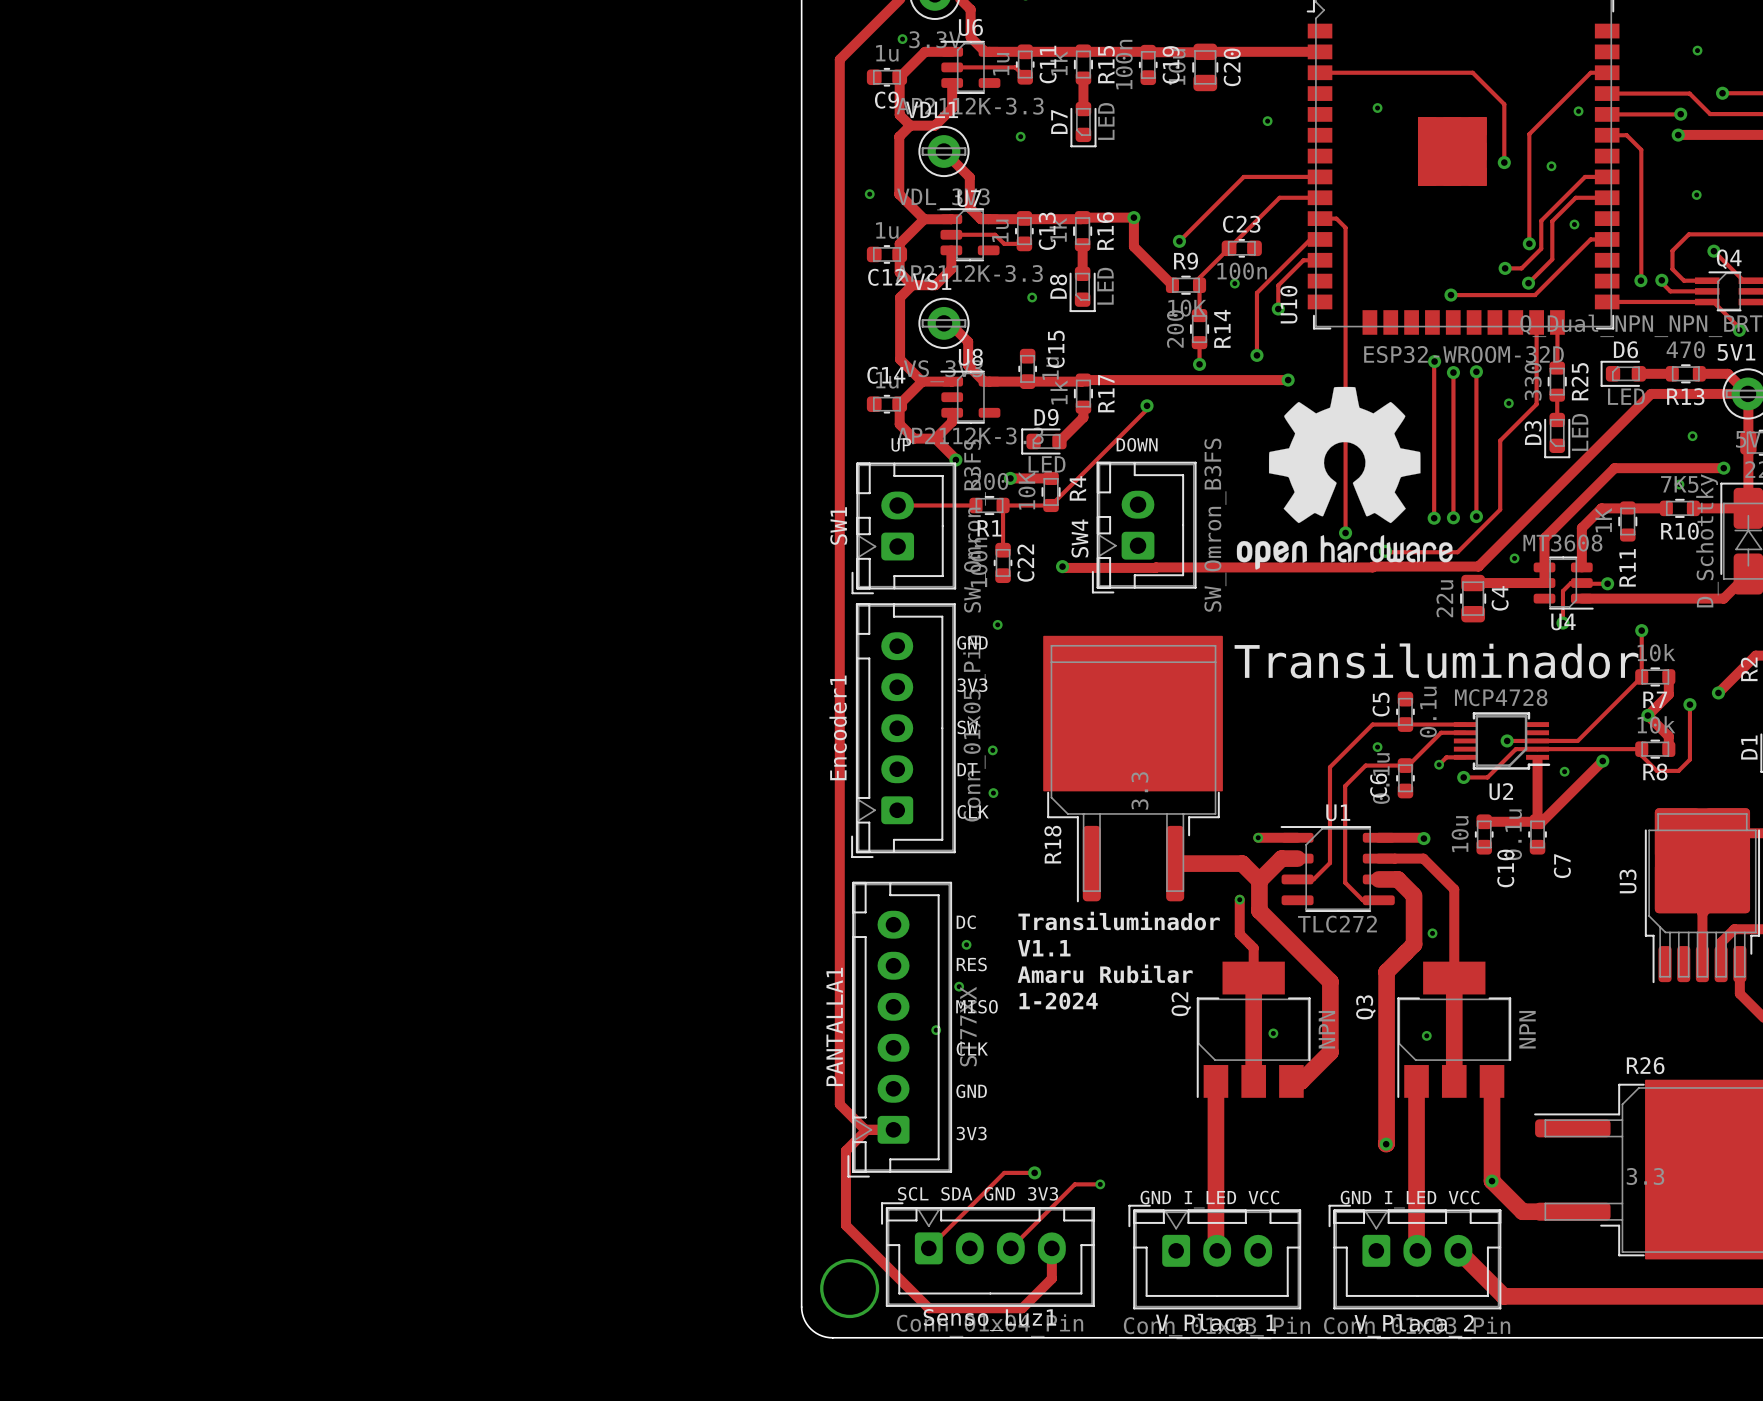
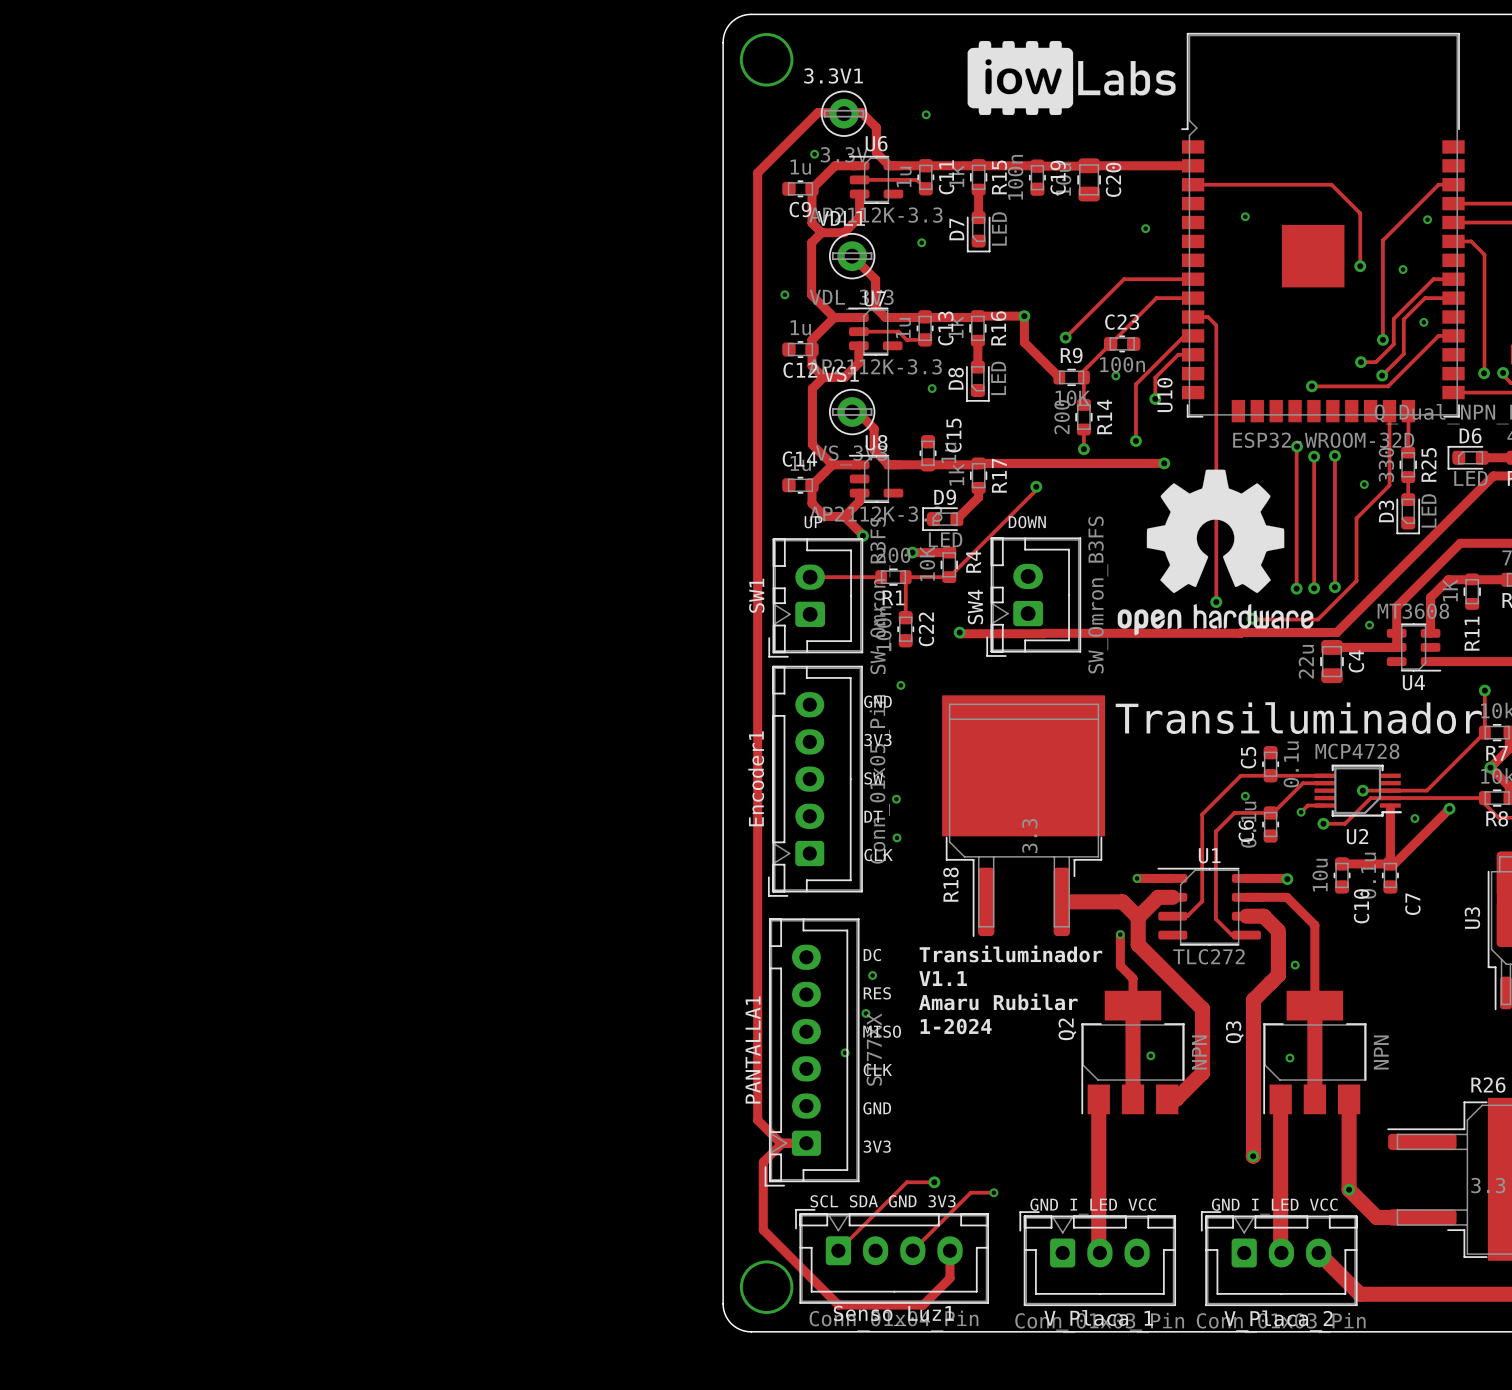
track: (1607, 583) (1570, 583) (1562, 591) (1562, 623) -> none
via: (1607, 583) -> none
via: (1562, 623) -> none

